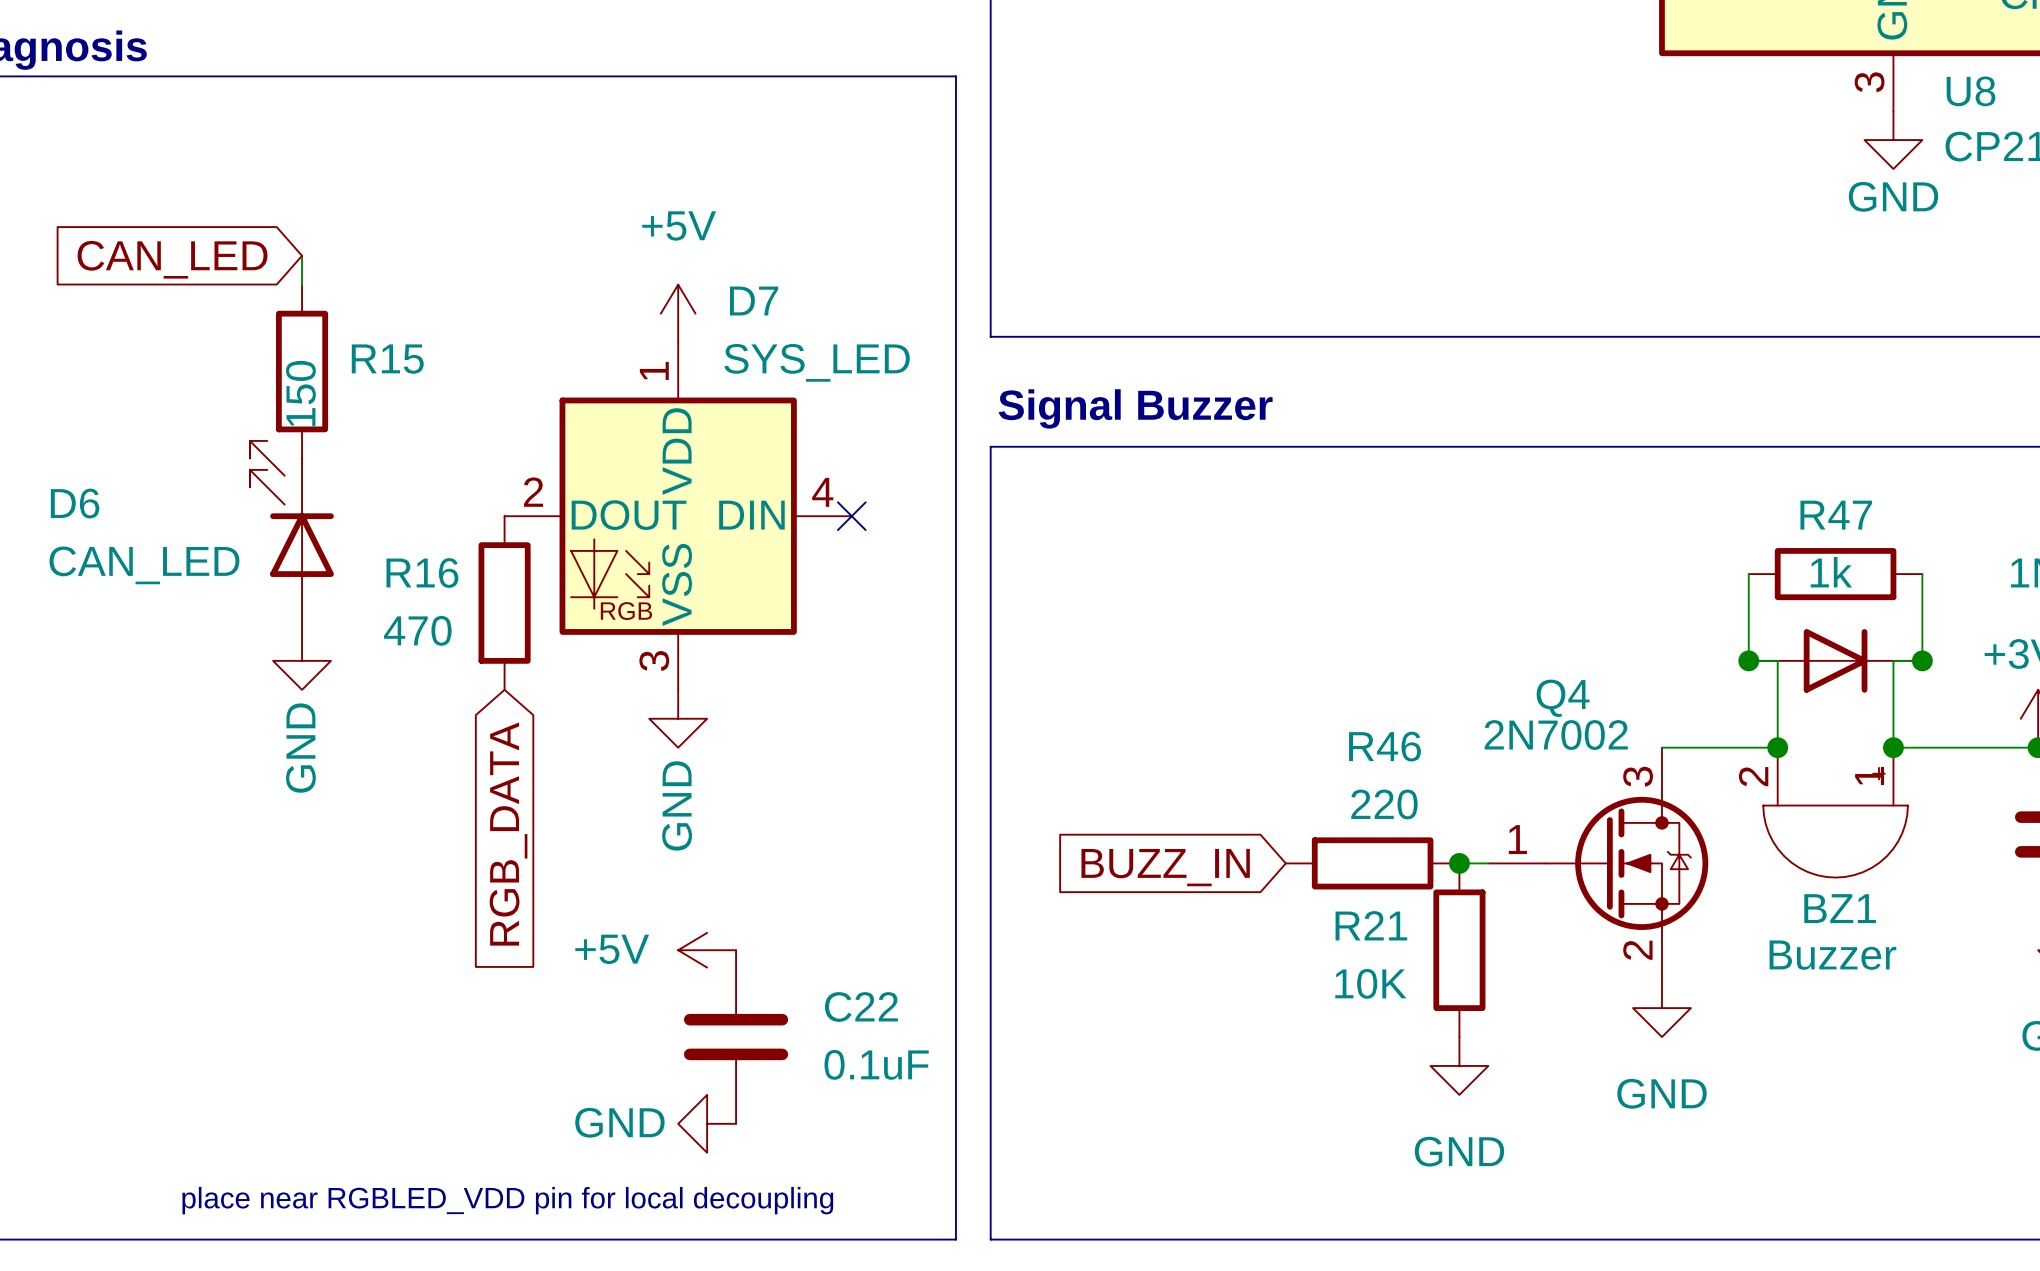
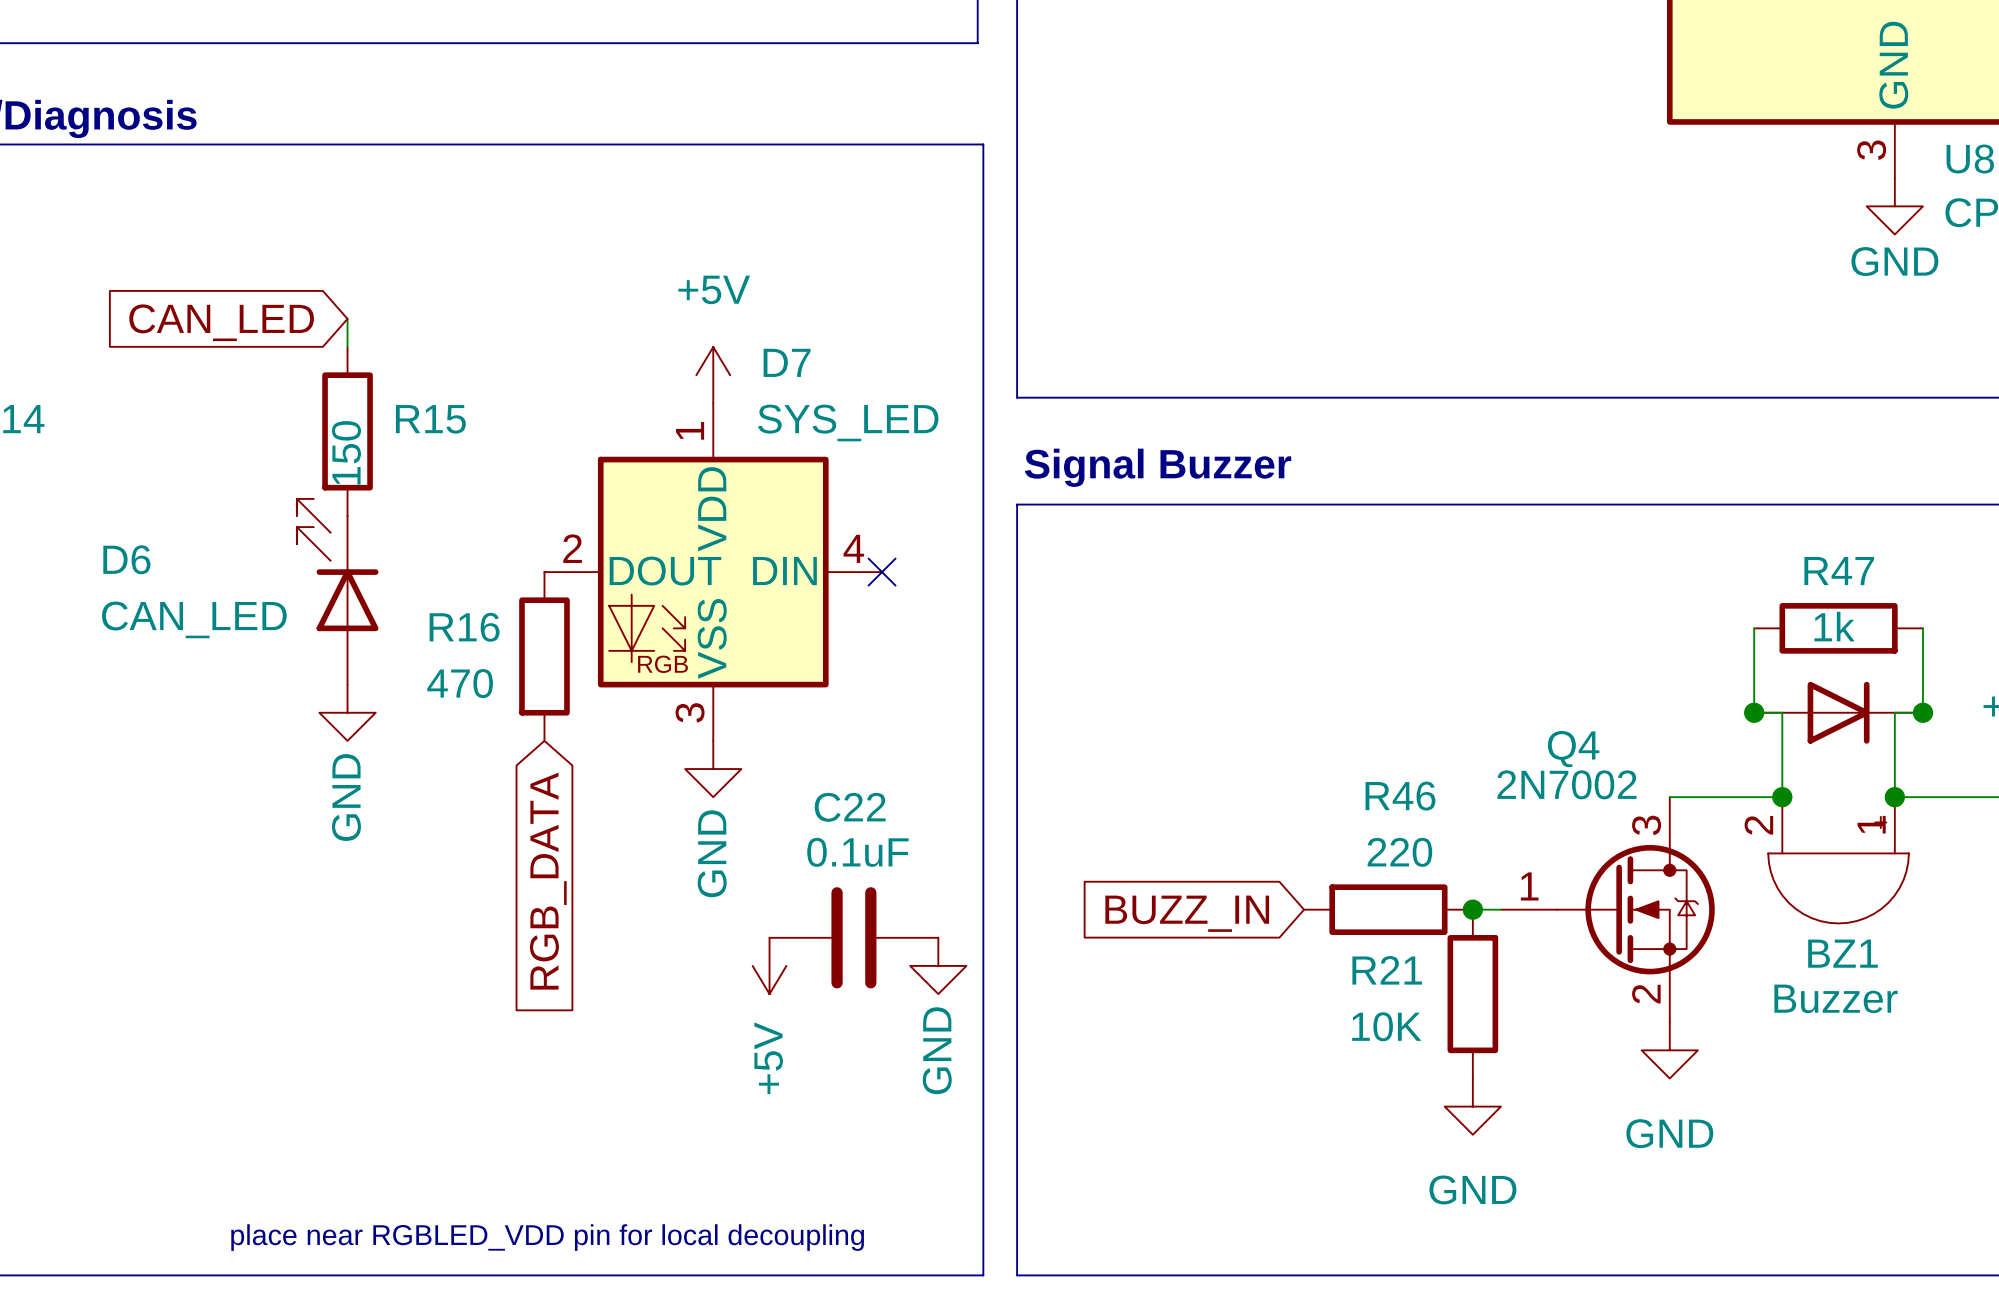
power symbol rotation: 0° (707, 950) -> 90° counterclockwise (769, 965)
power symbol position: +5V (707, 950) -> +5V (769, 965)
C22 name position: C22 (861, 1007) -> C22 (850, 807)
C22 rotation: 0° (736, 1037) -> 90° clockwise (853, 937)
C22 position: (736, 1037) -> (853, 937)
C22 value position: 0.1uF (876, 1064) -> 0.1uF (857, 852)
power symbol rotation: 0° (707, 1123) -> 90° counterclockwise (938, 965)
power symbol position: GND (707, 1123) -> GND (938, 965)

